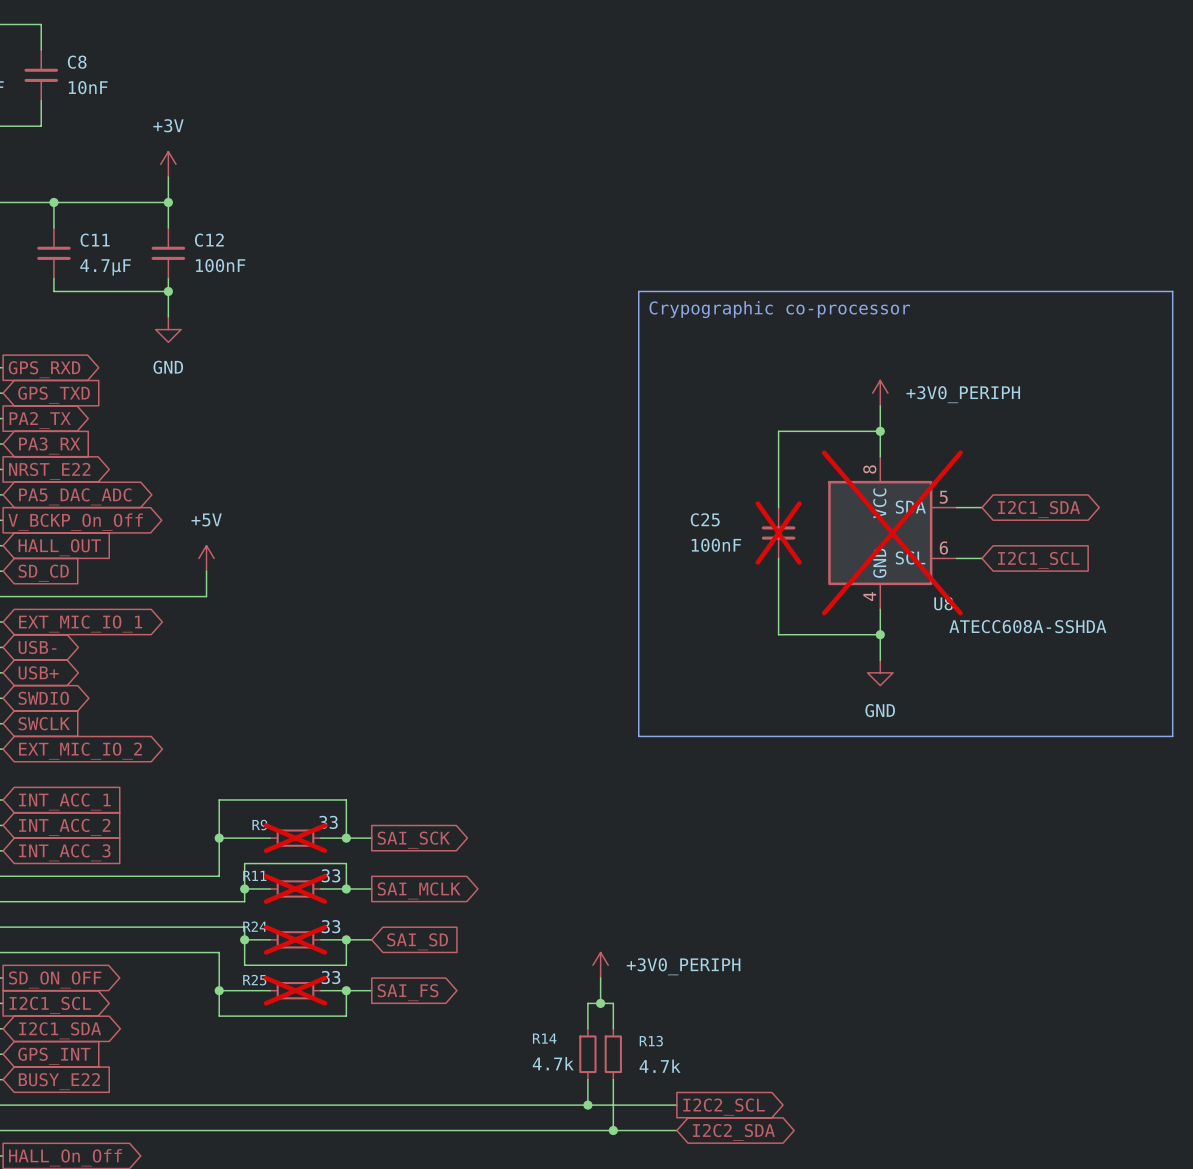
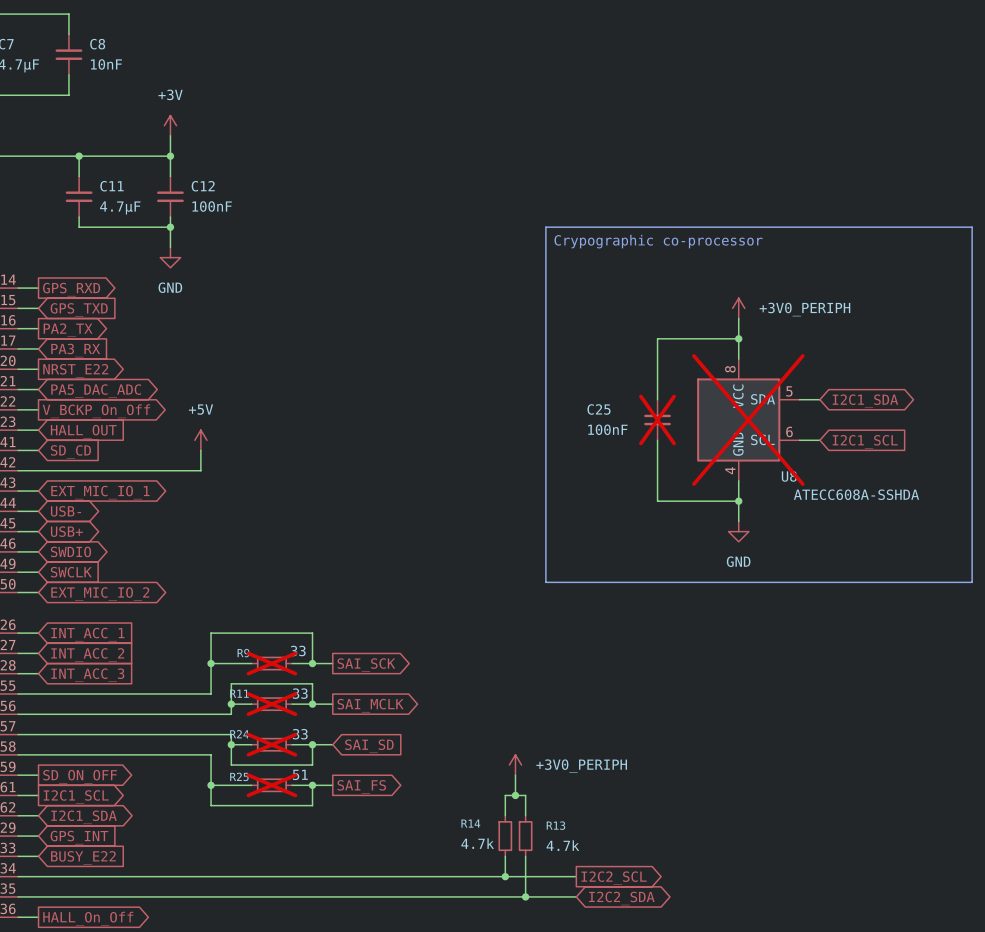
R25 value: 33 (331, 977) -> 51 (300, 774)

